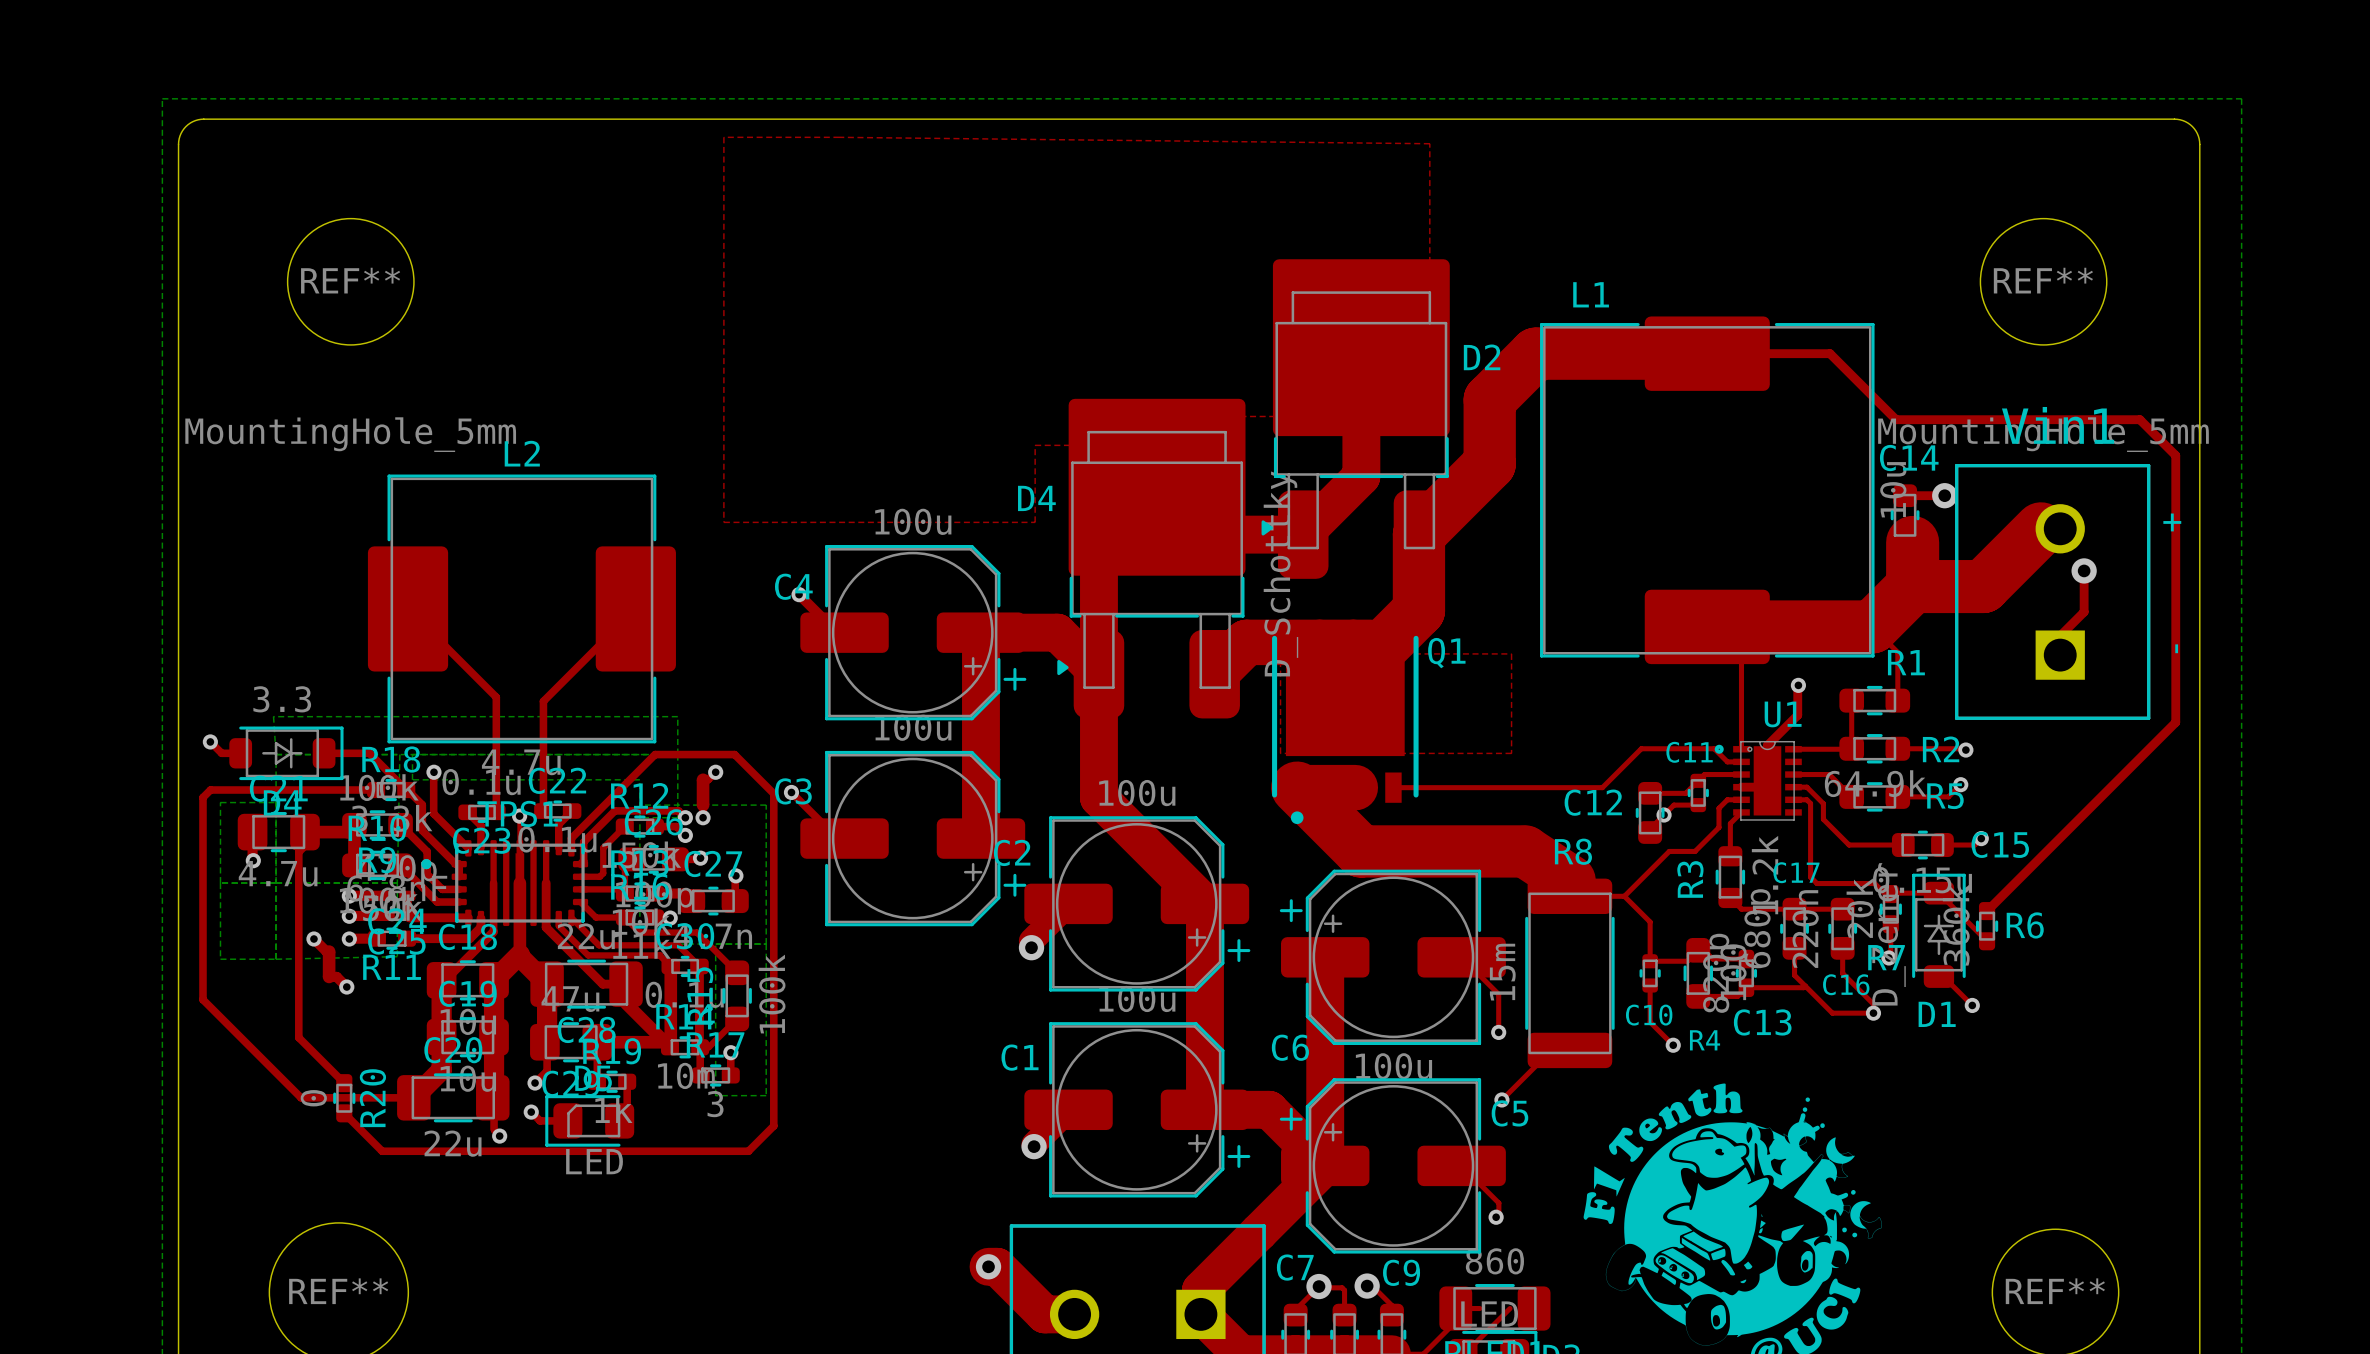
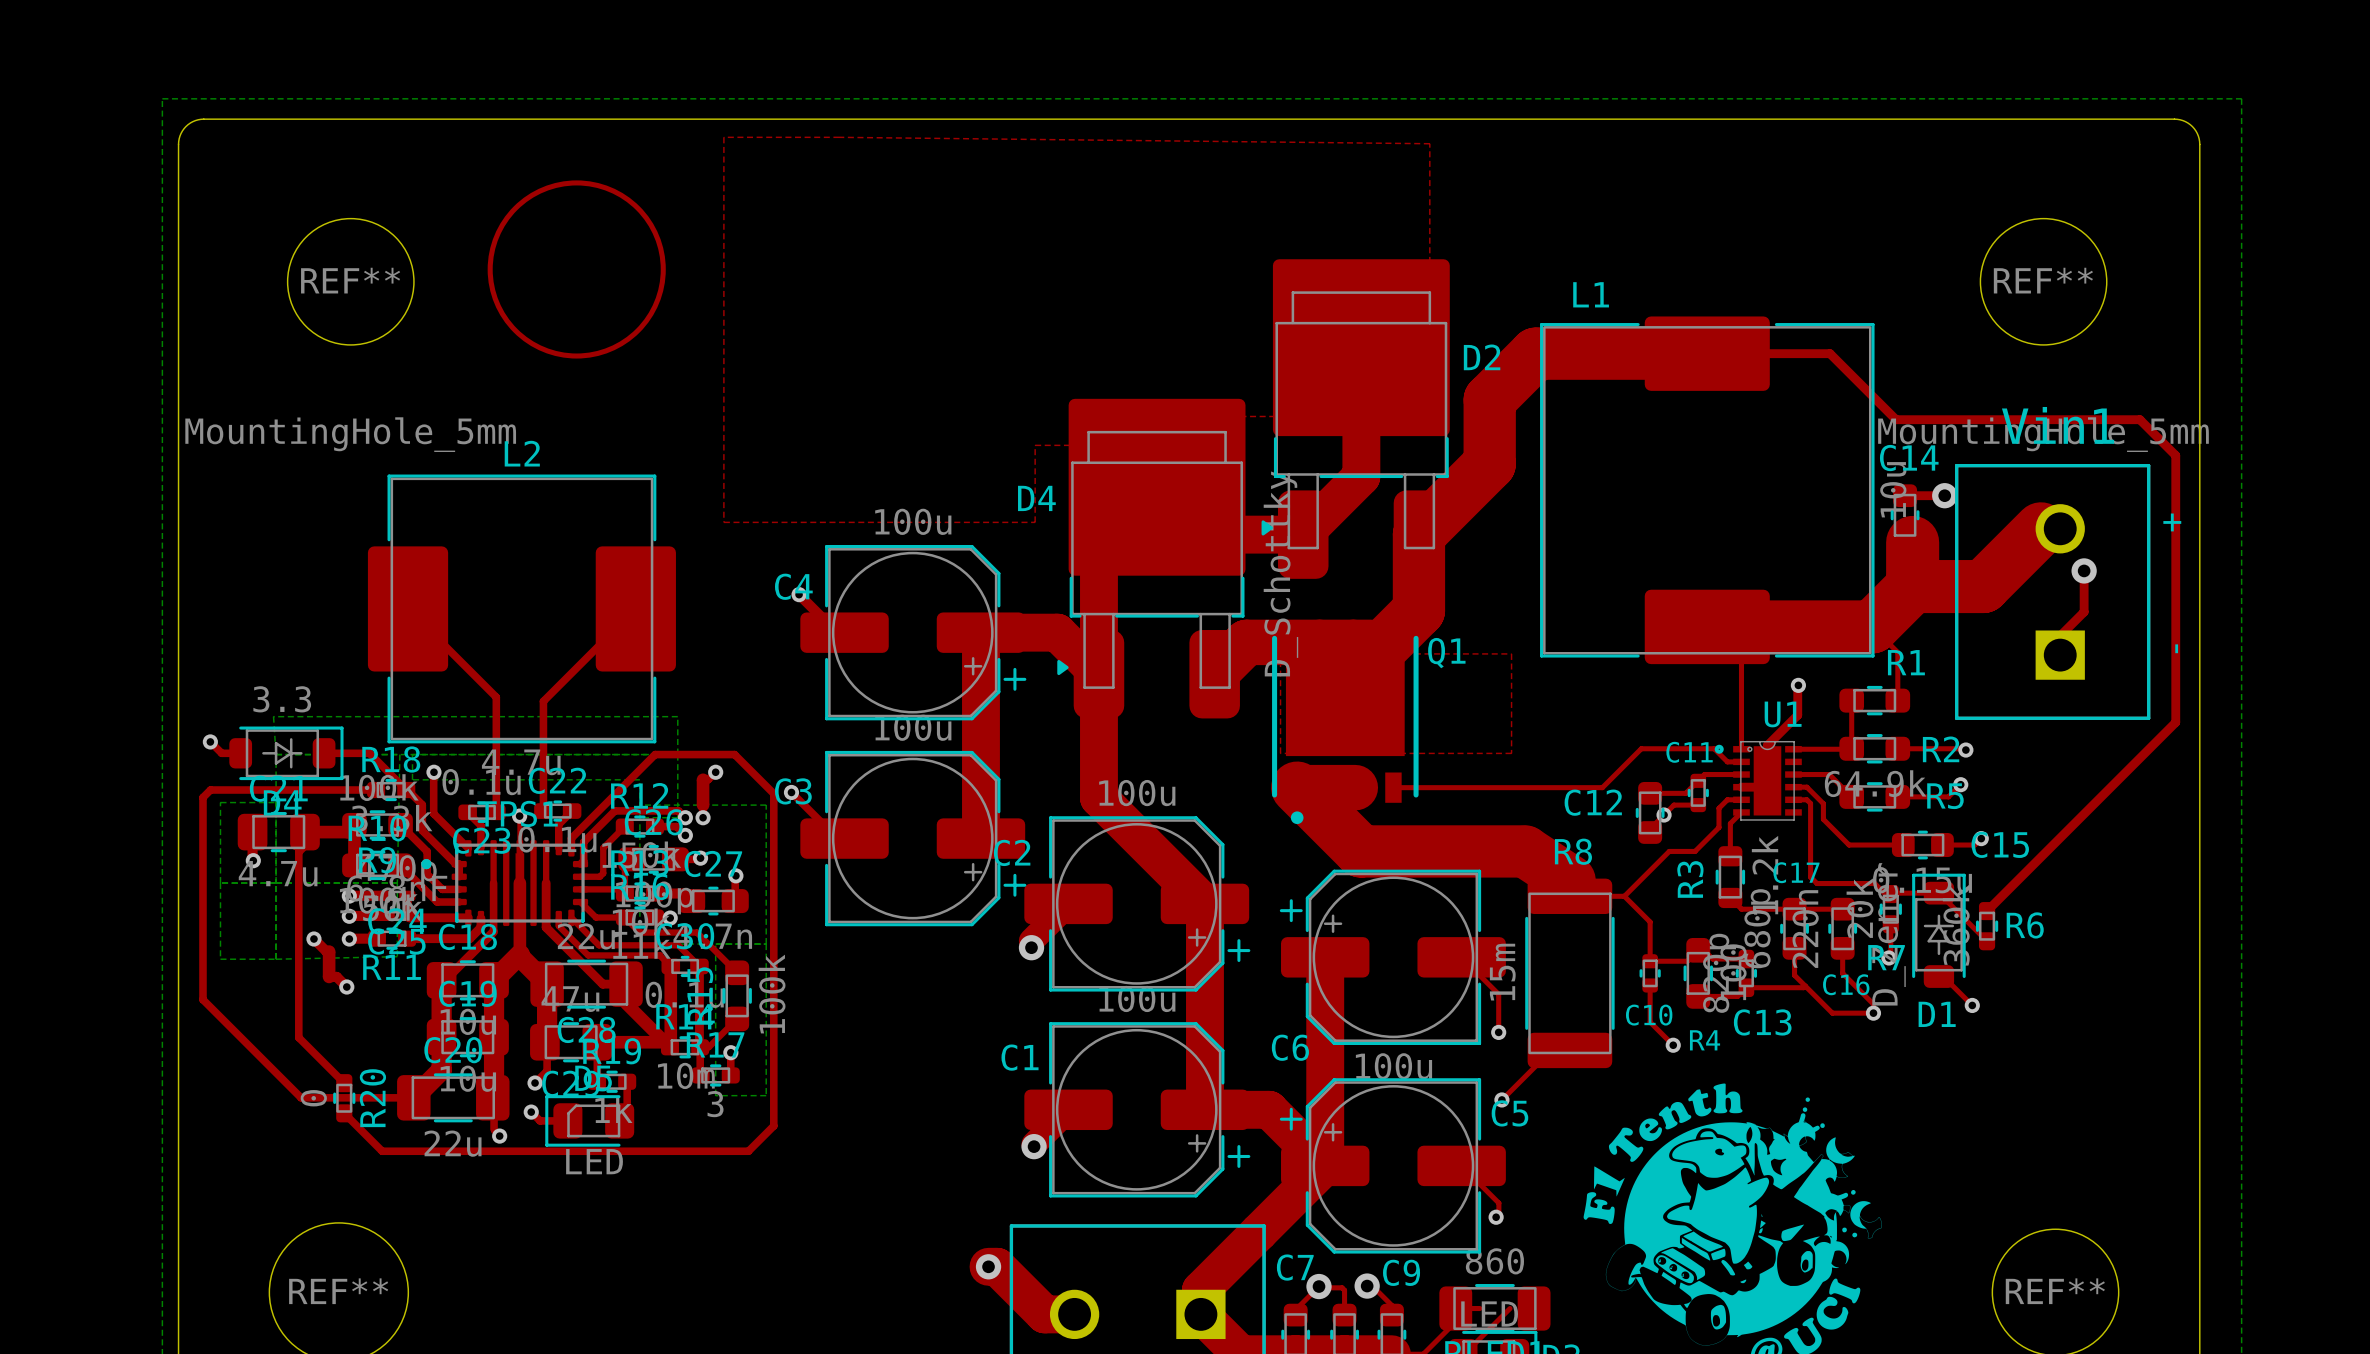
drawing: none -> [487, 180, 666, 359]

